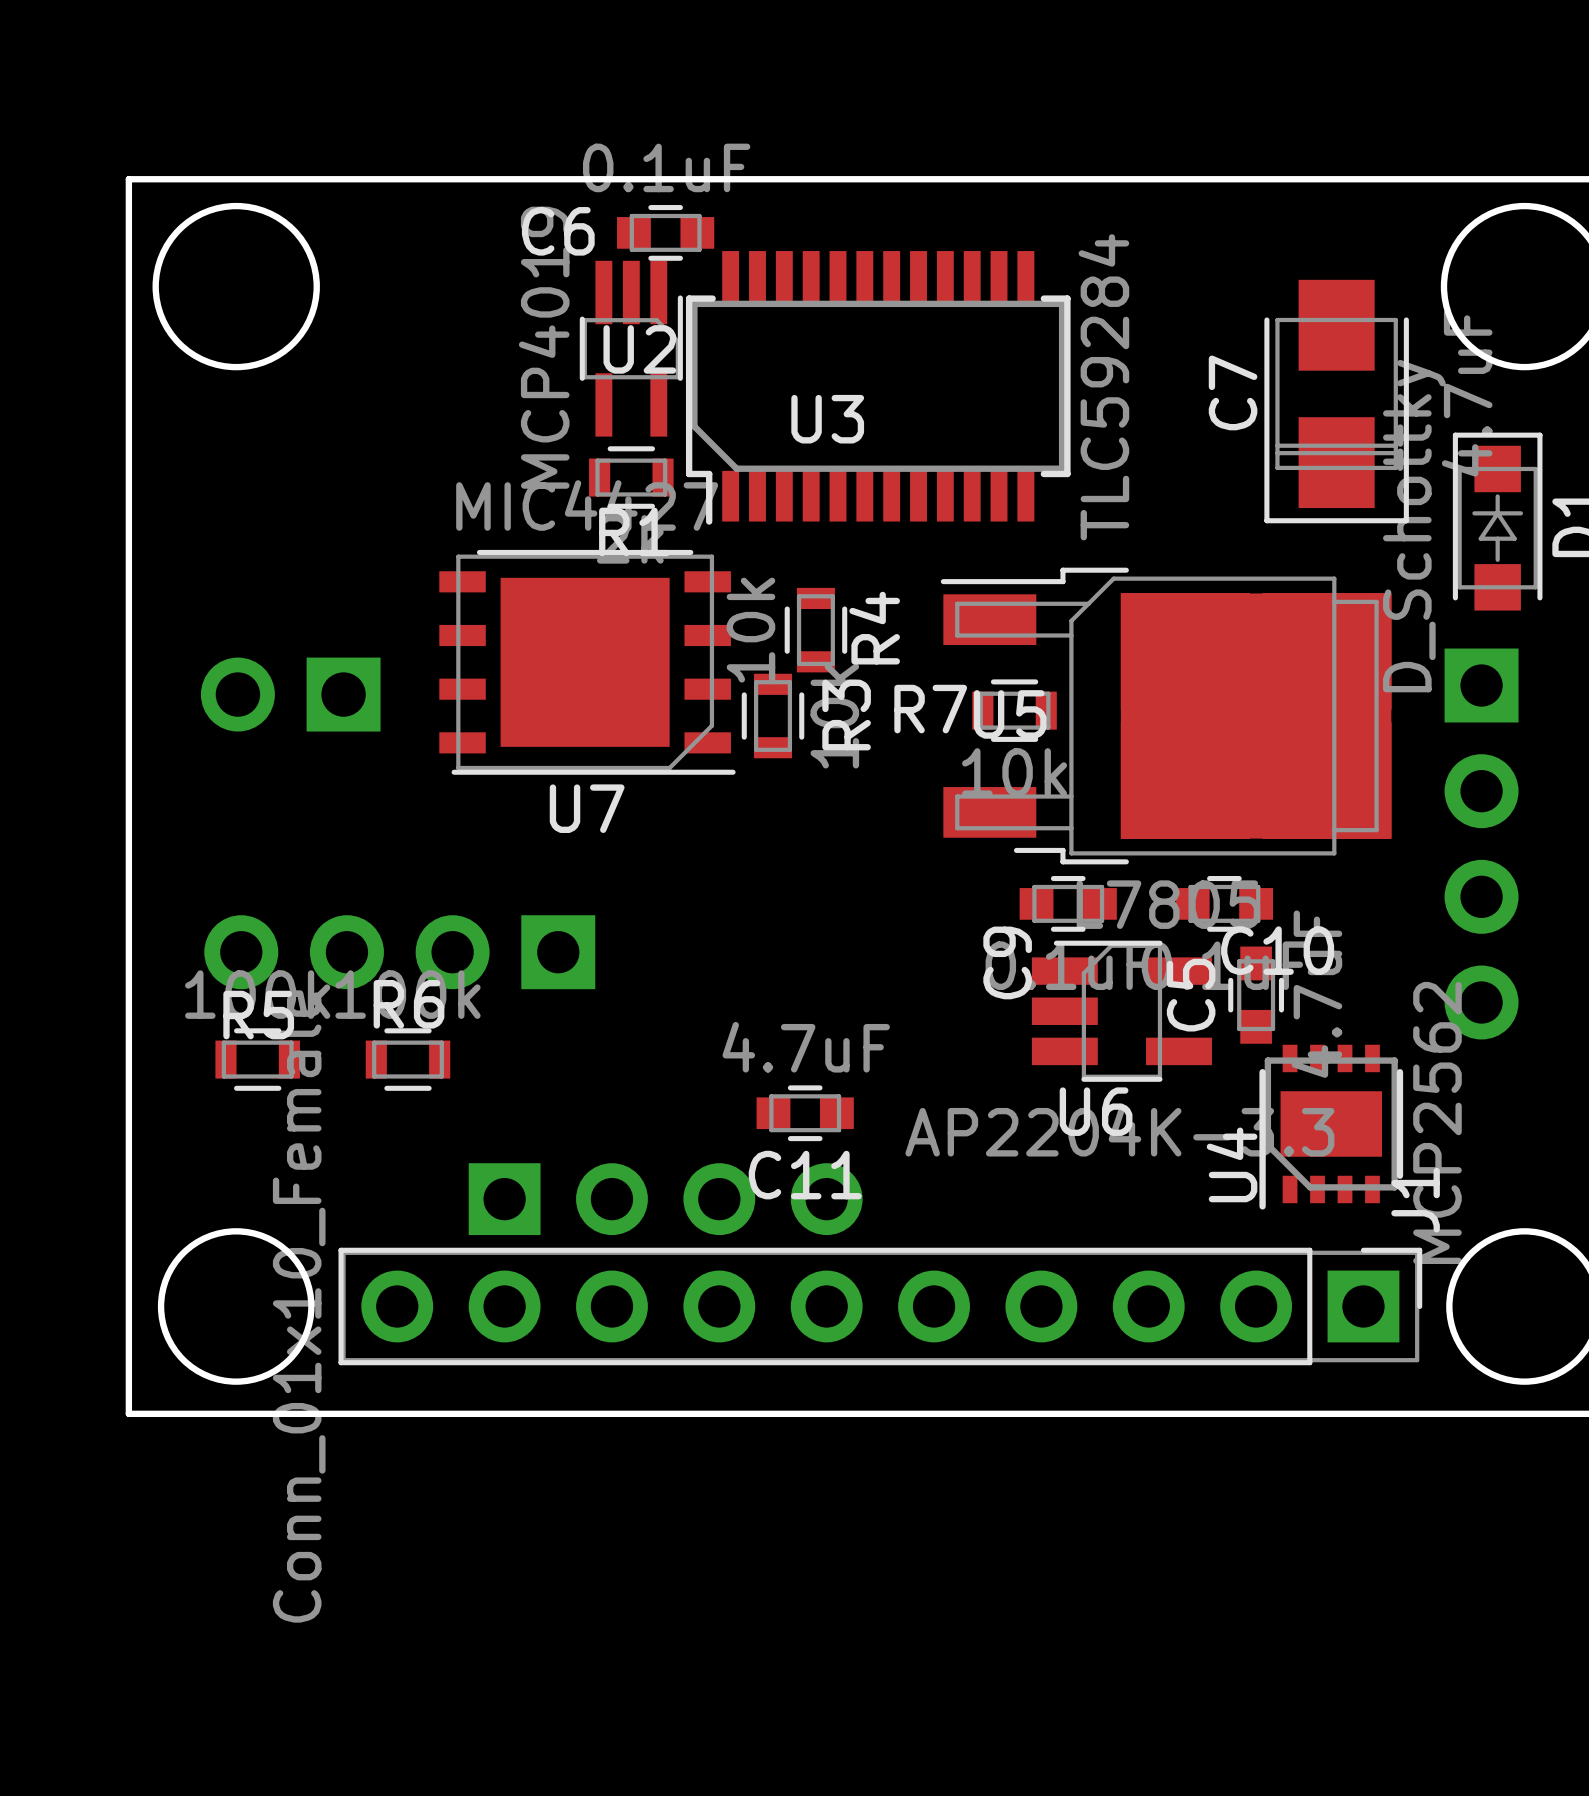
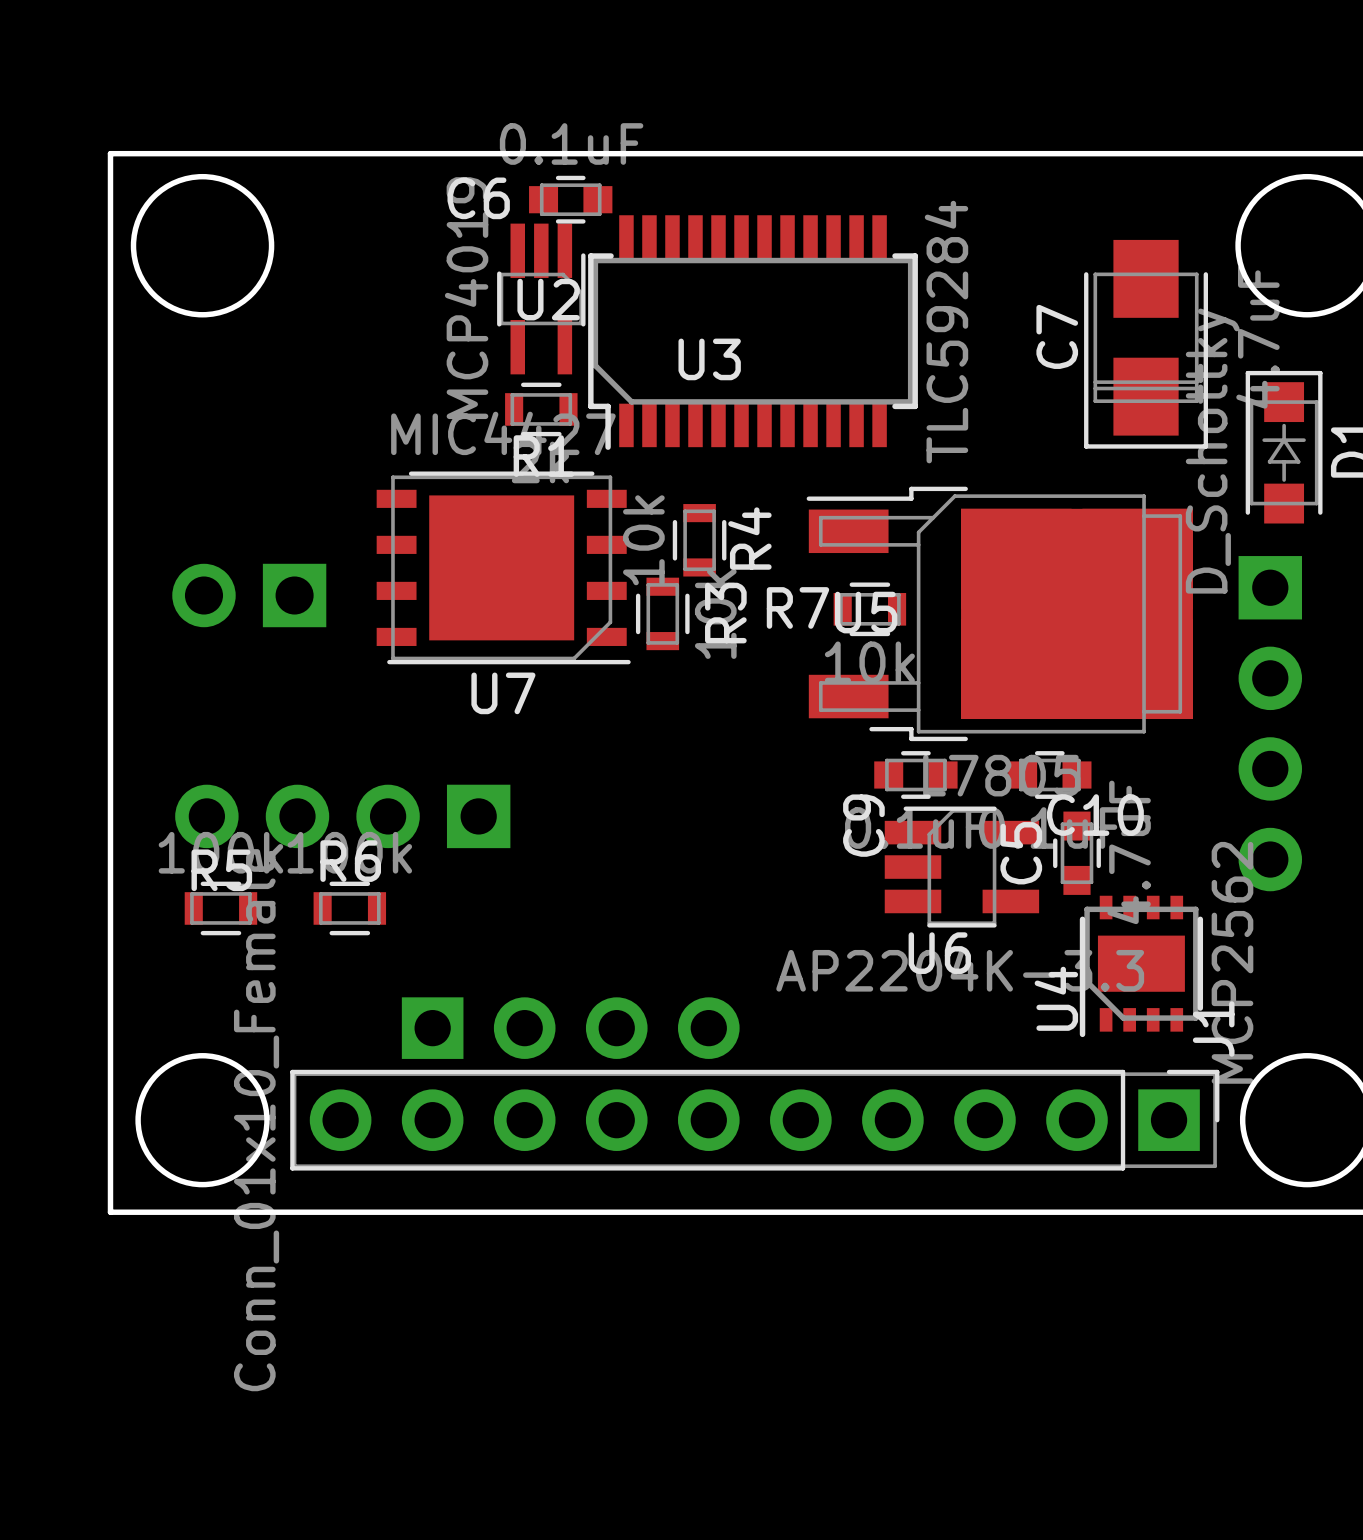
C11: 4.7uF (805, 1113) -> none

